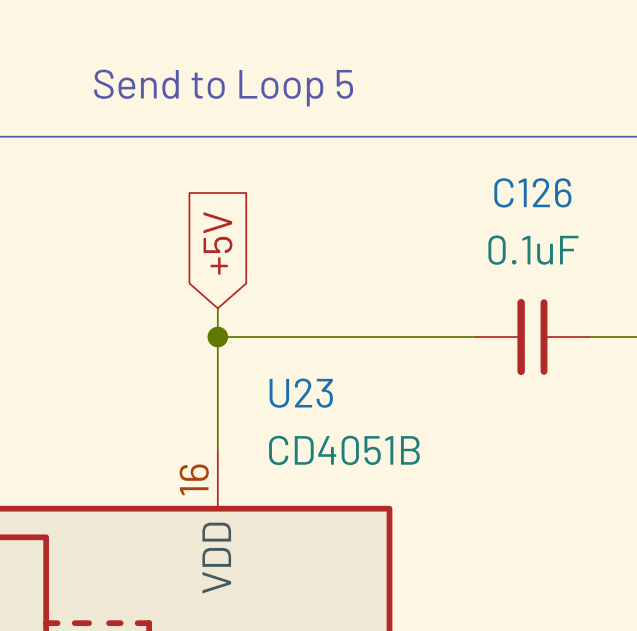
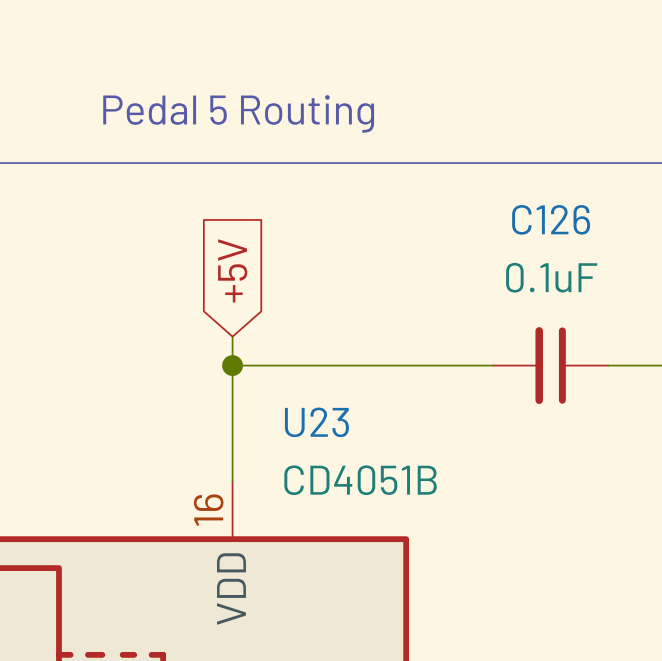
text: Send to Loop 5 (223, 88) -> Pedal 5 Routing (238, 113)

